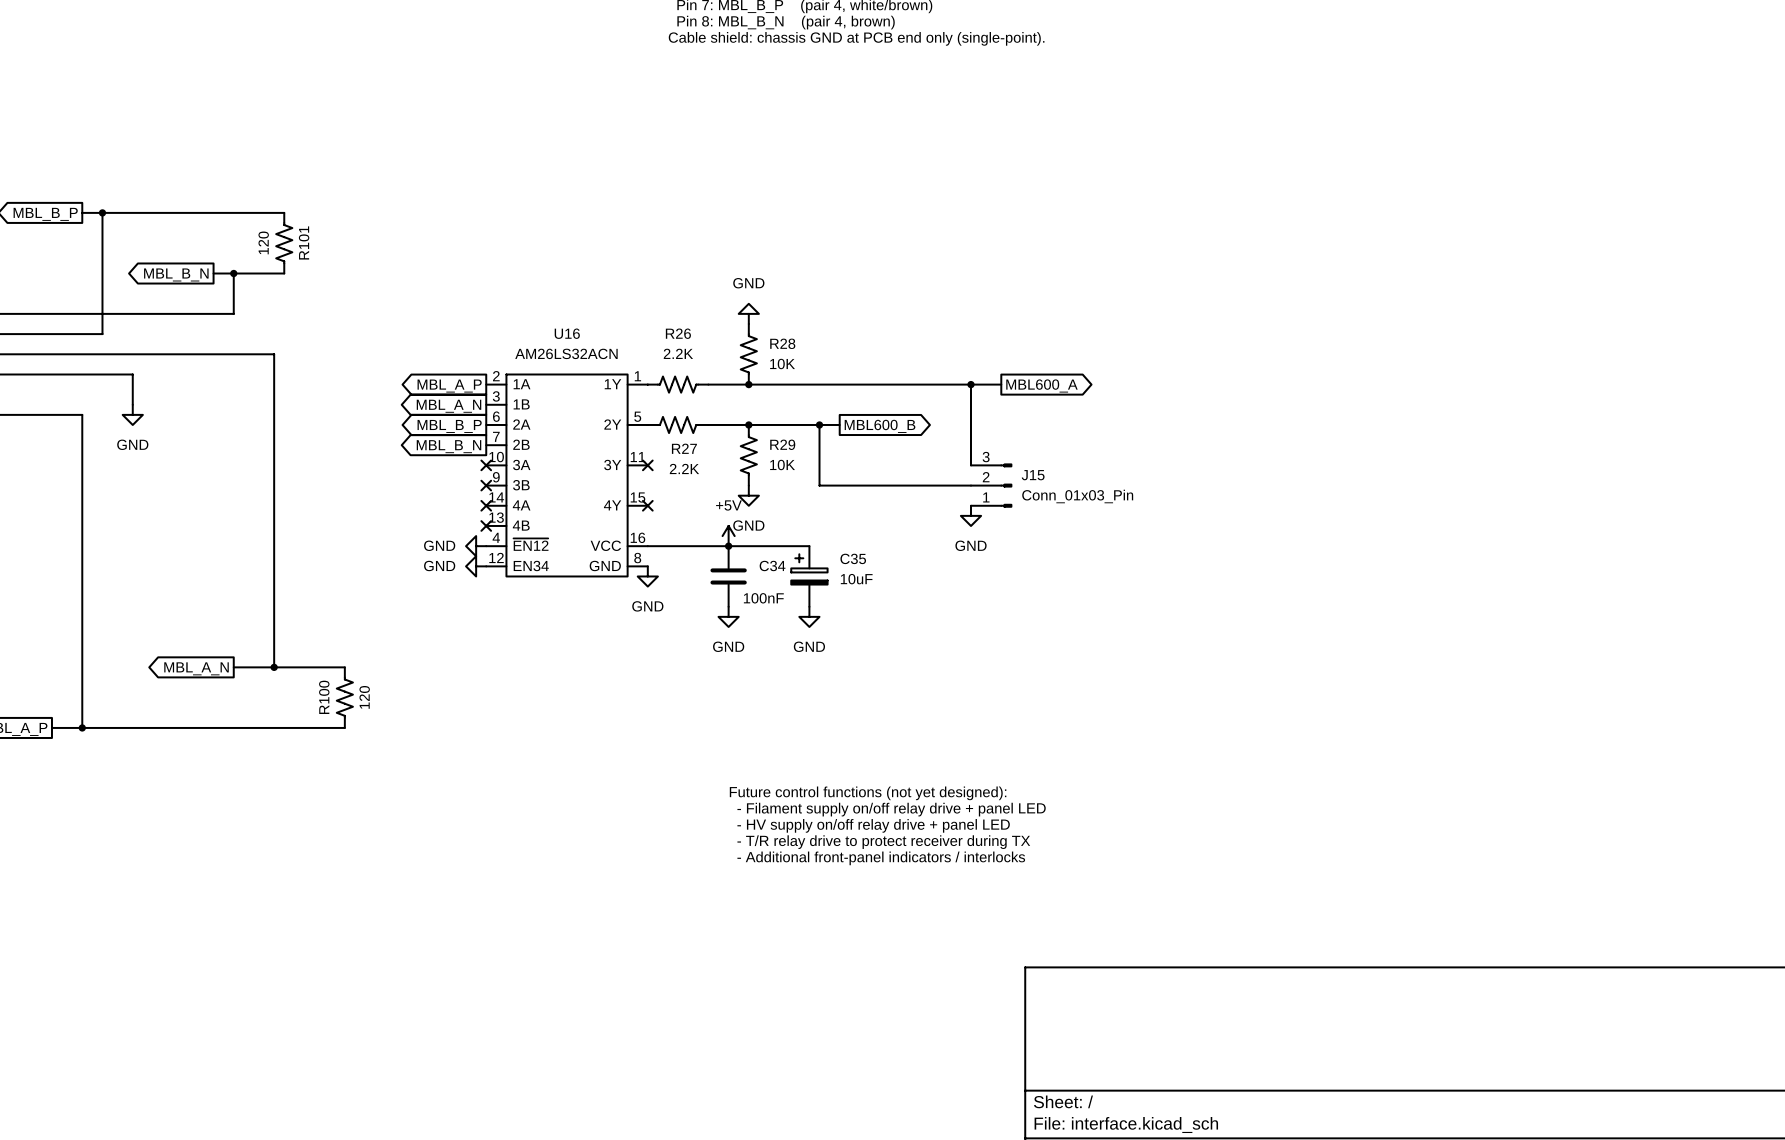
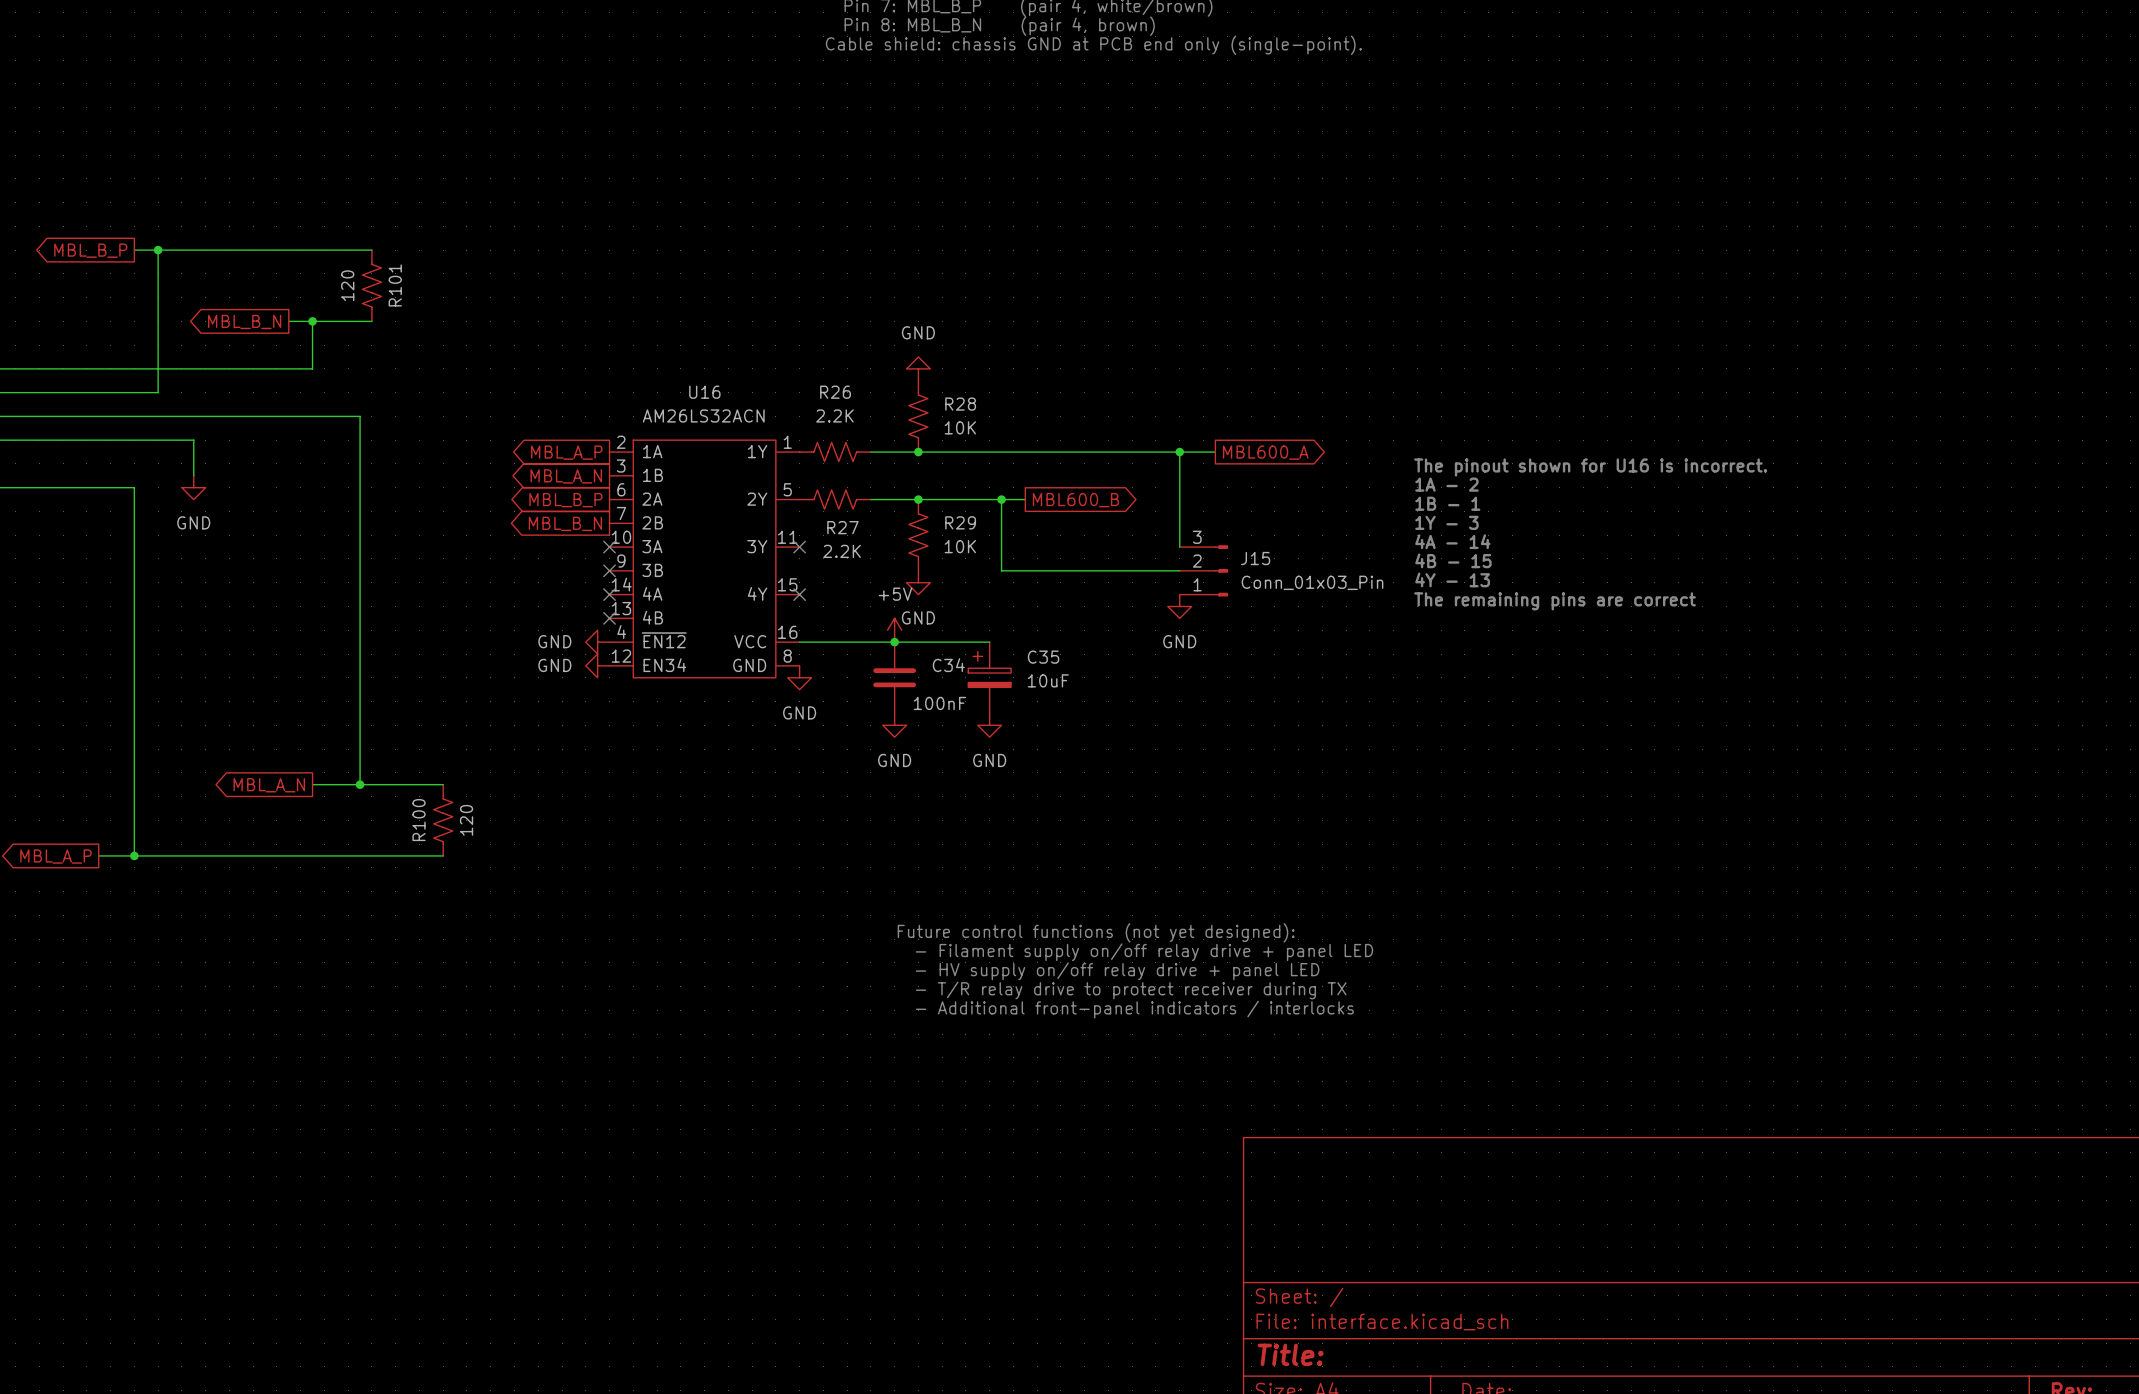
text: none -> The pinout shown for U16 is incorrect. (1590, 467)
text: none -> 1A - 2 (1446, 484)
text: none -> 1B - 1 (1447, 503)
text: none -> 1Y - 3 (1446, 522)
text: none -> 4A - 14 (1452, 541)
text: none -> 4B - 15 (1453, 560)
text: none -> 4Y - 13 (1452, 579)
text: none -> The remaining pins are correct (1555, 601)

